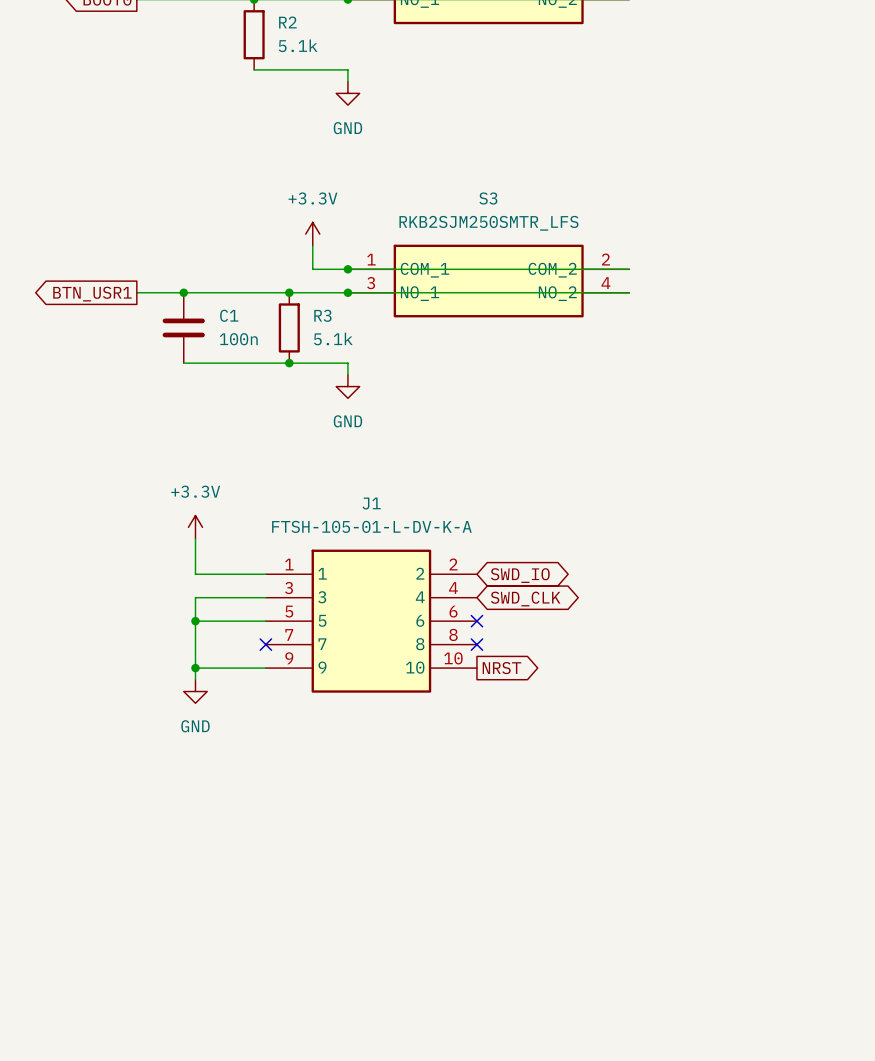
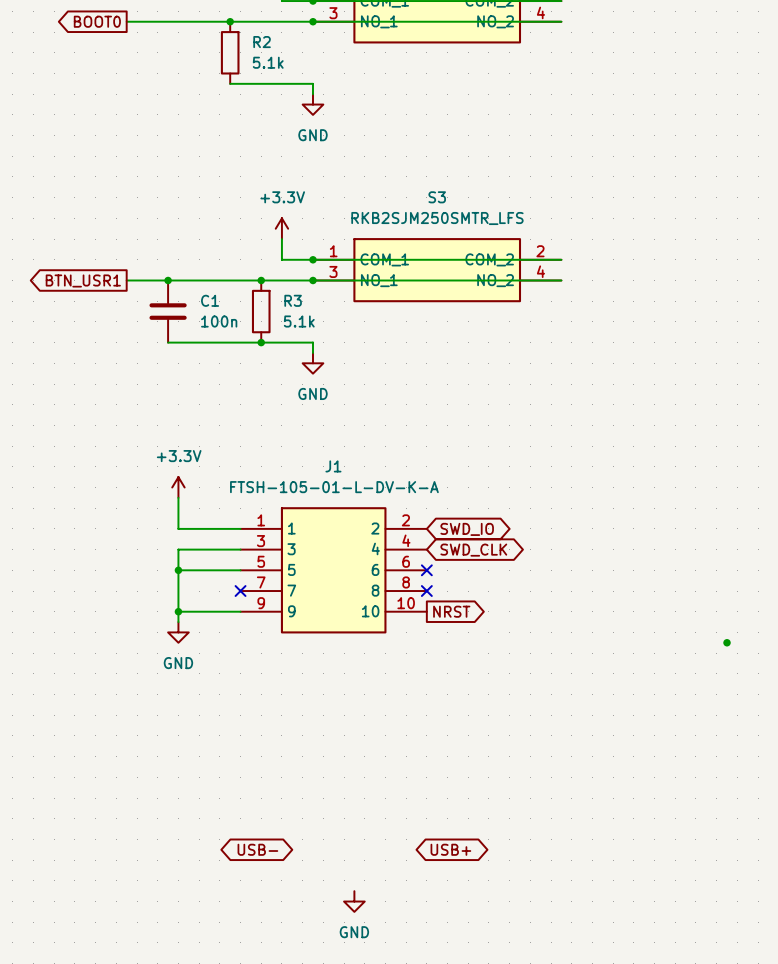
junction: none -> (727, 642)
global label: none -> USB- (257, 849)
global label: none -> USB+ (450, 849)
power symbol: none -> GND (354, 901)

